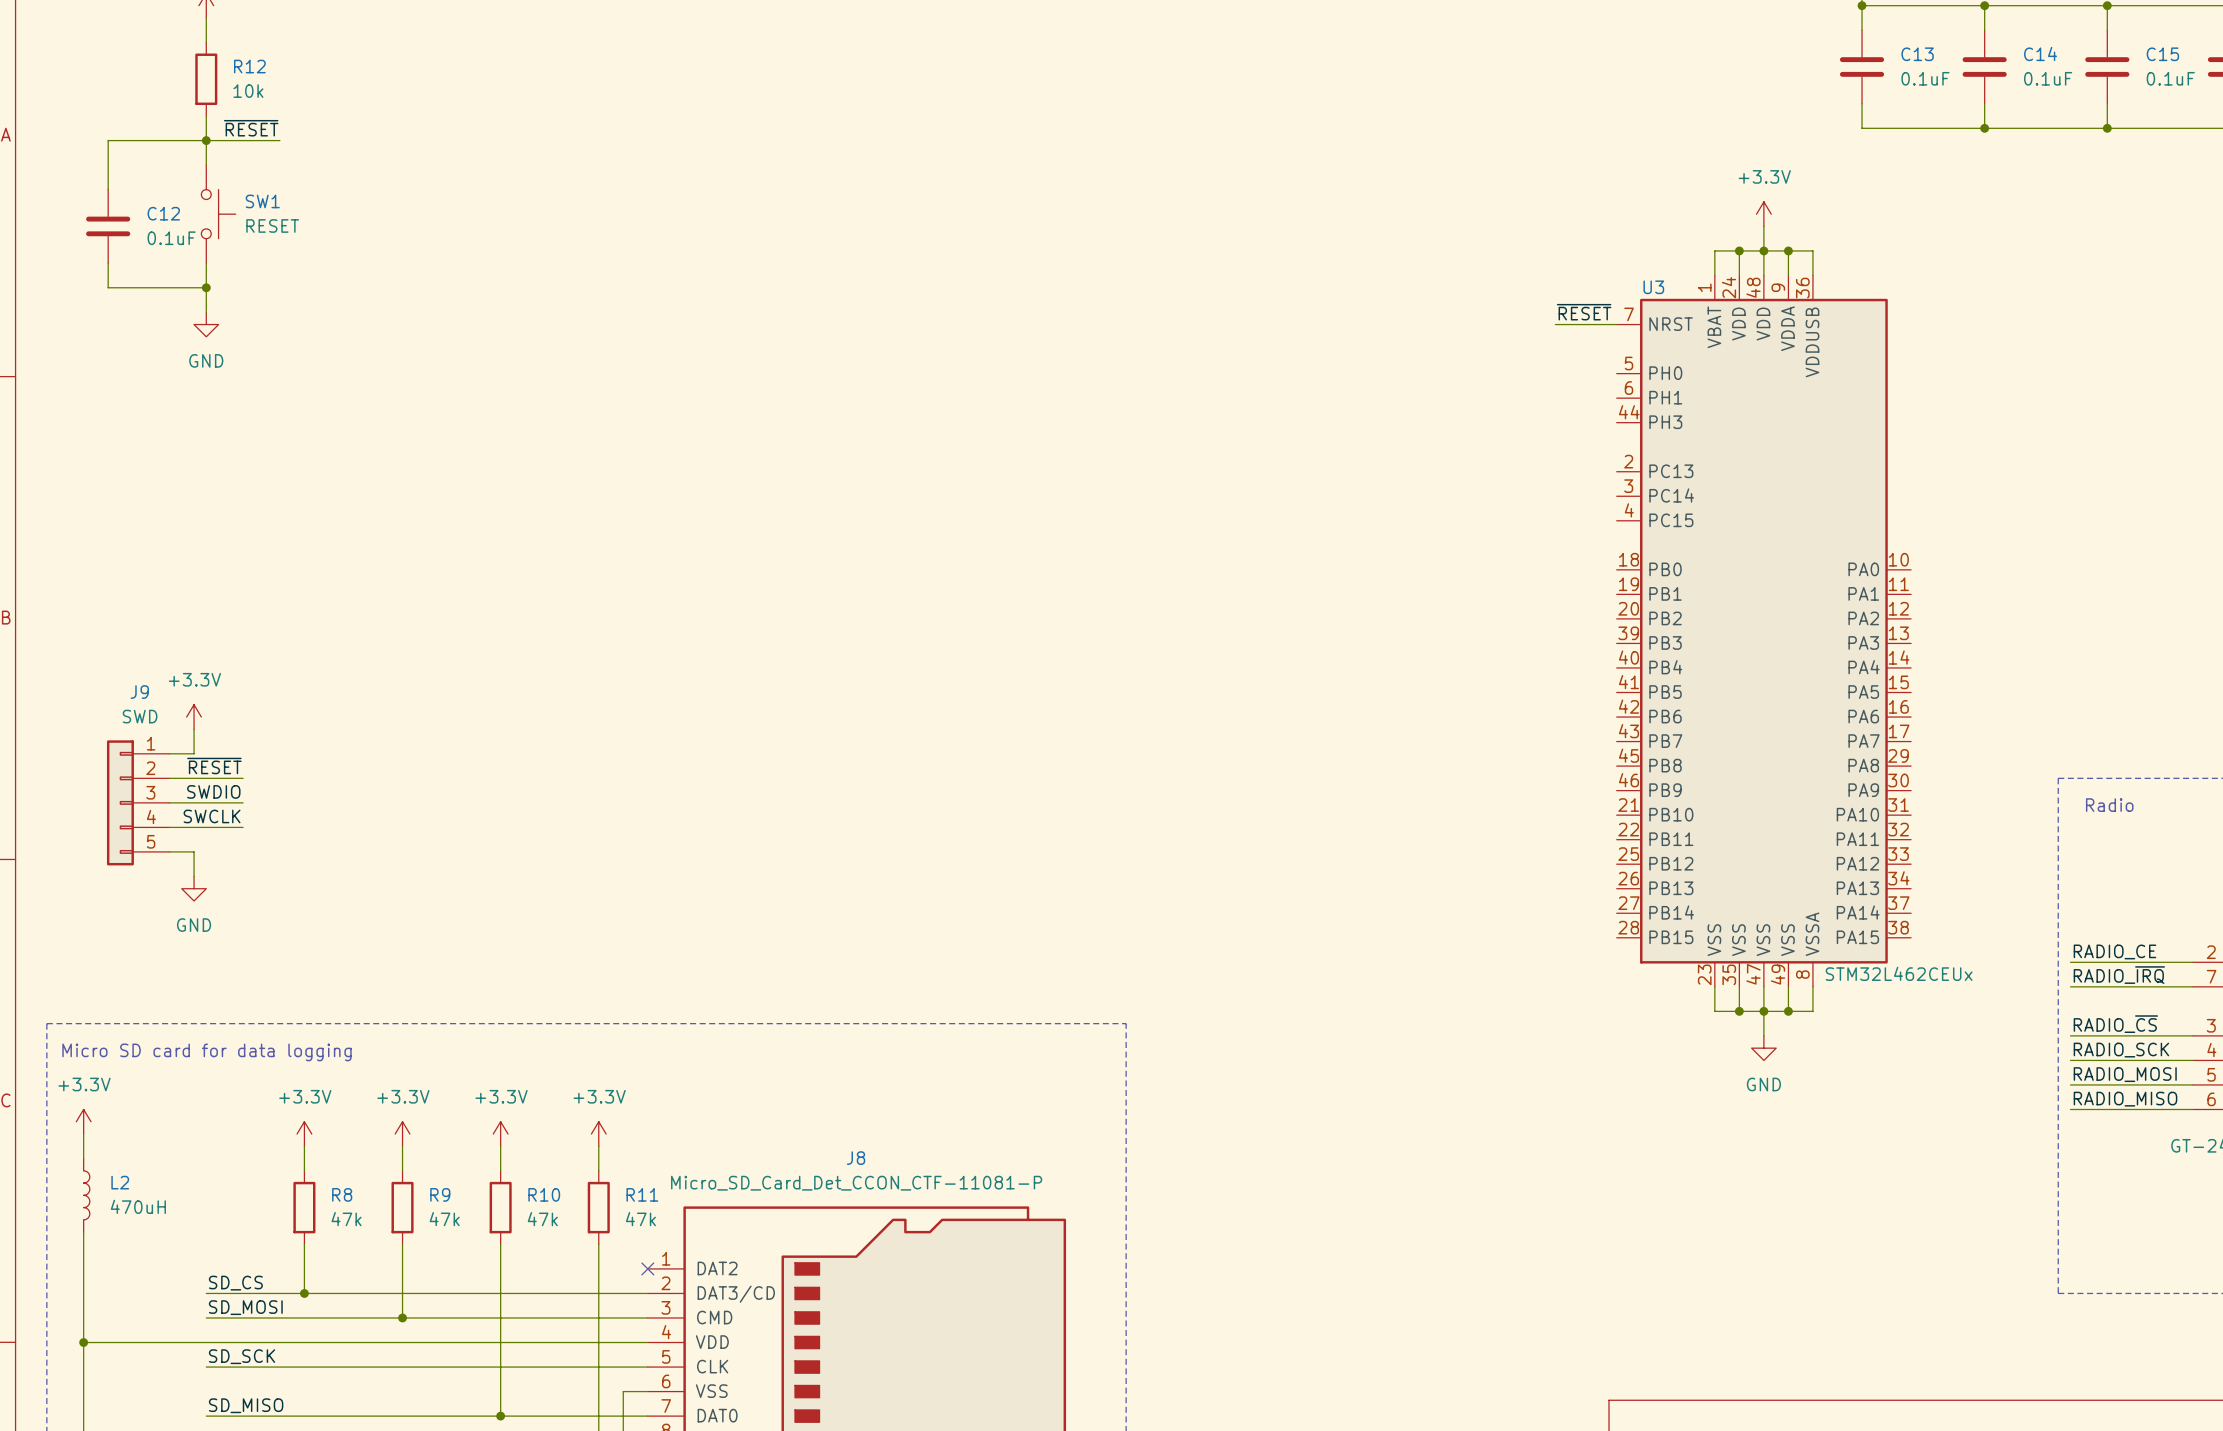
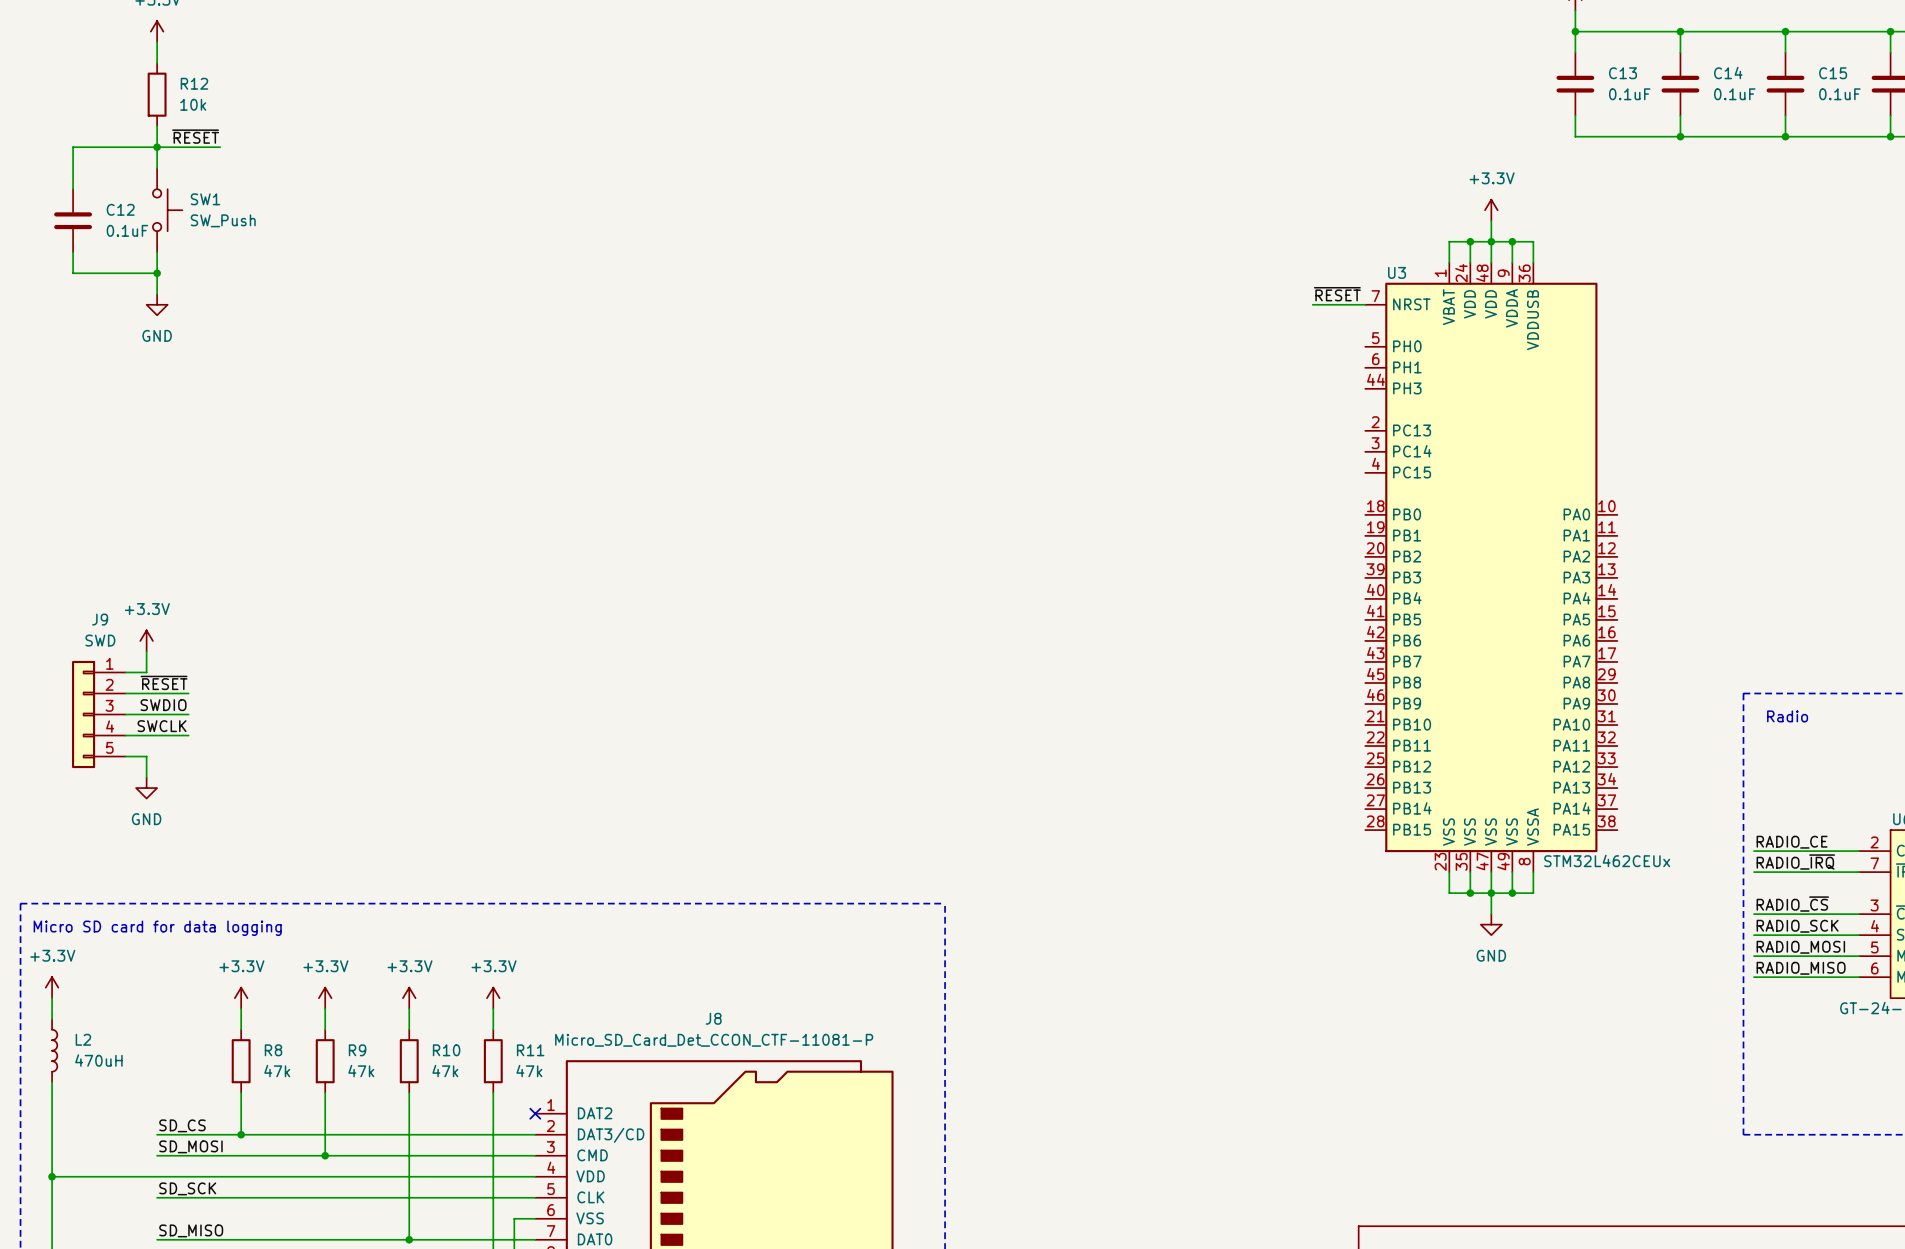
SW1 value: RESET (272, 225) -> SW_Push (223, 220)

